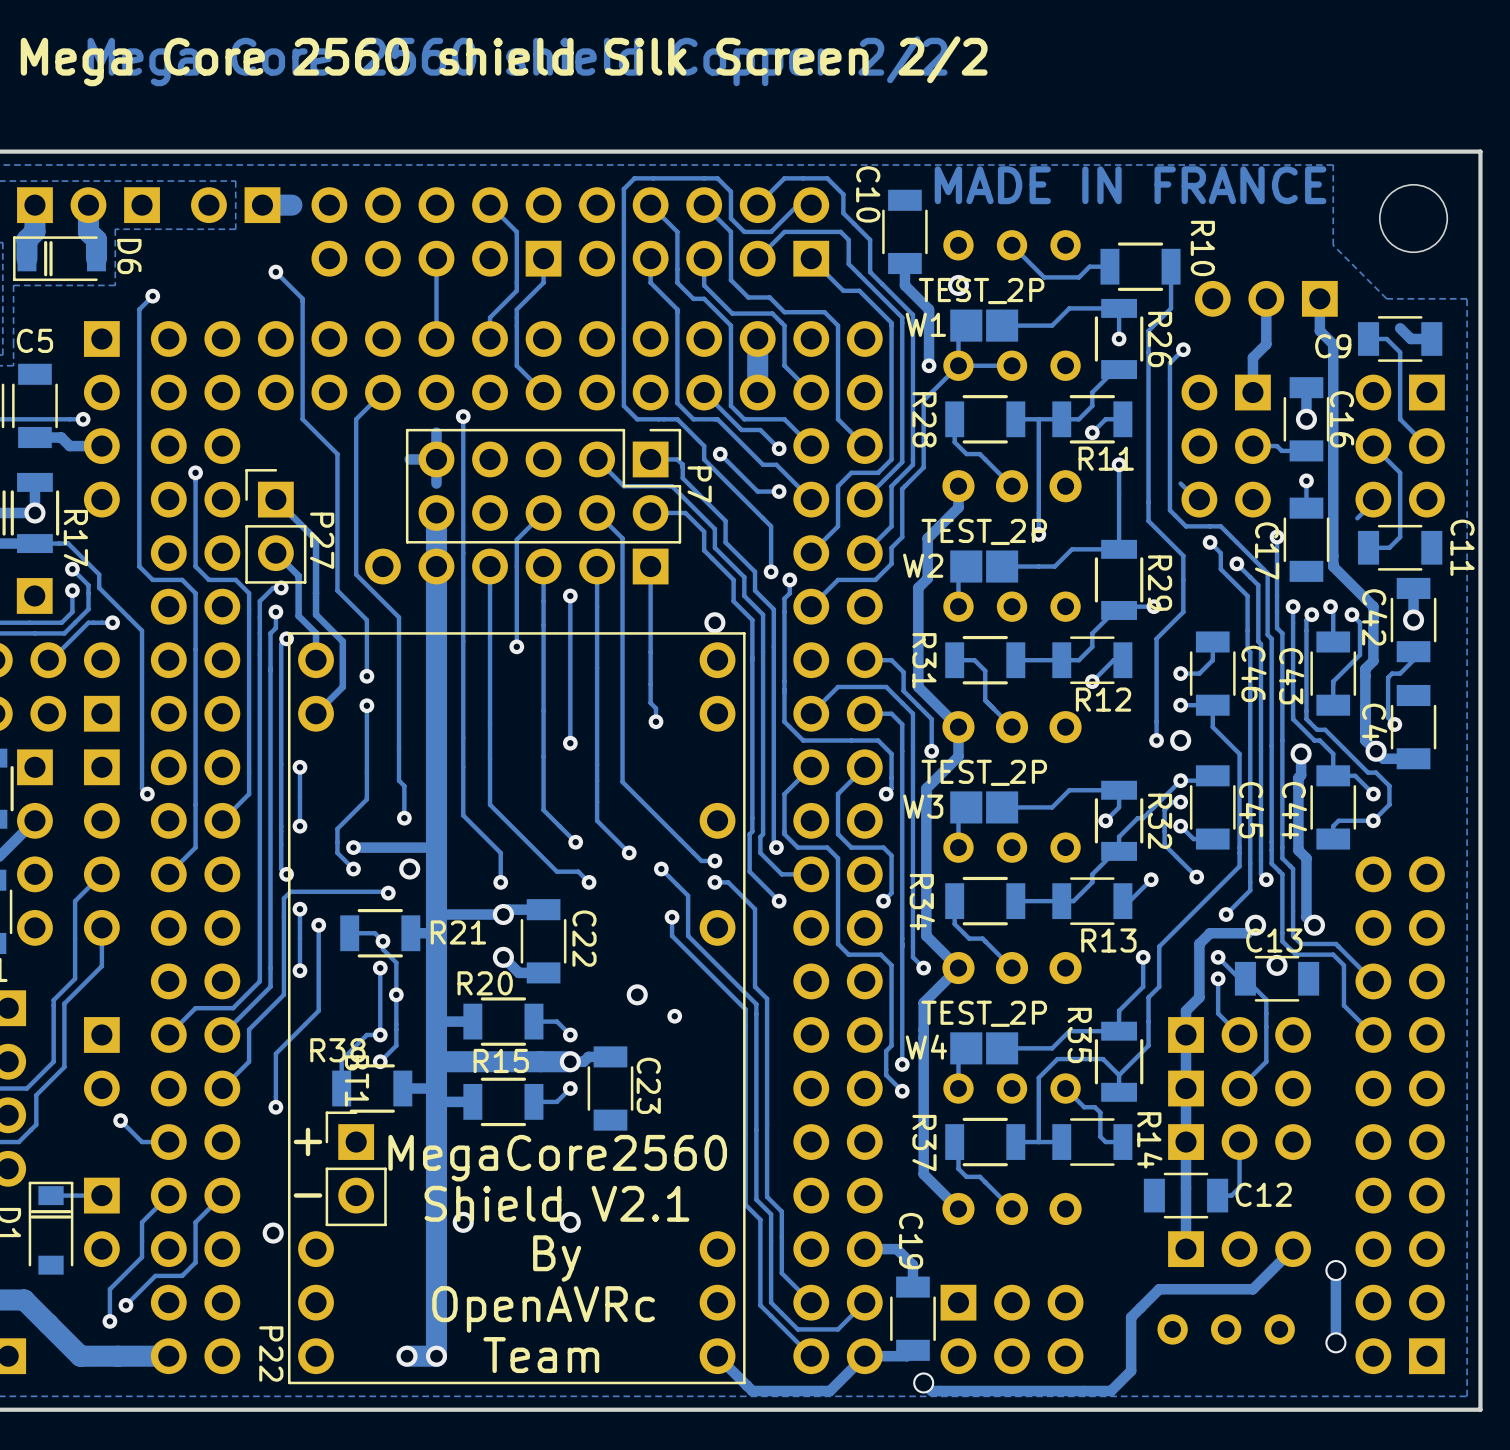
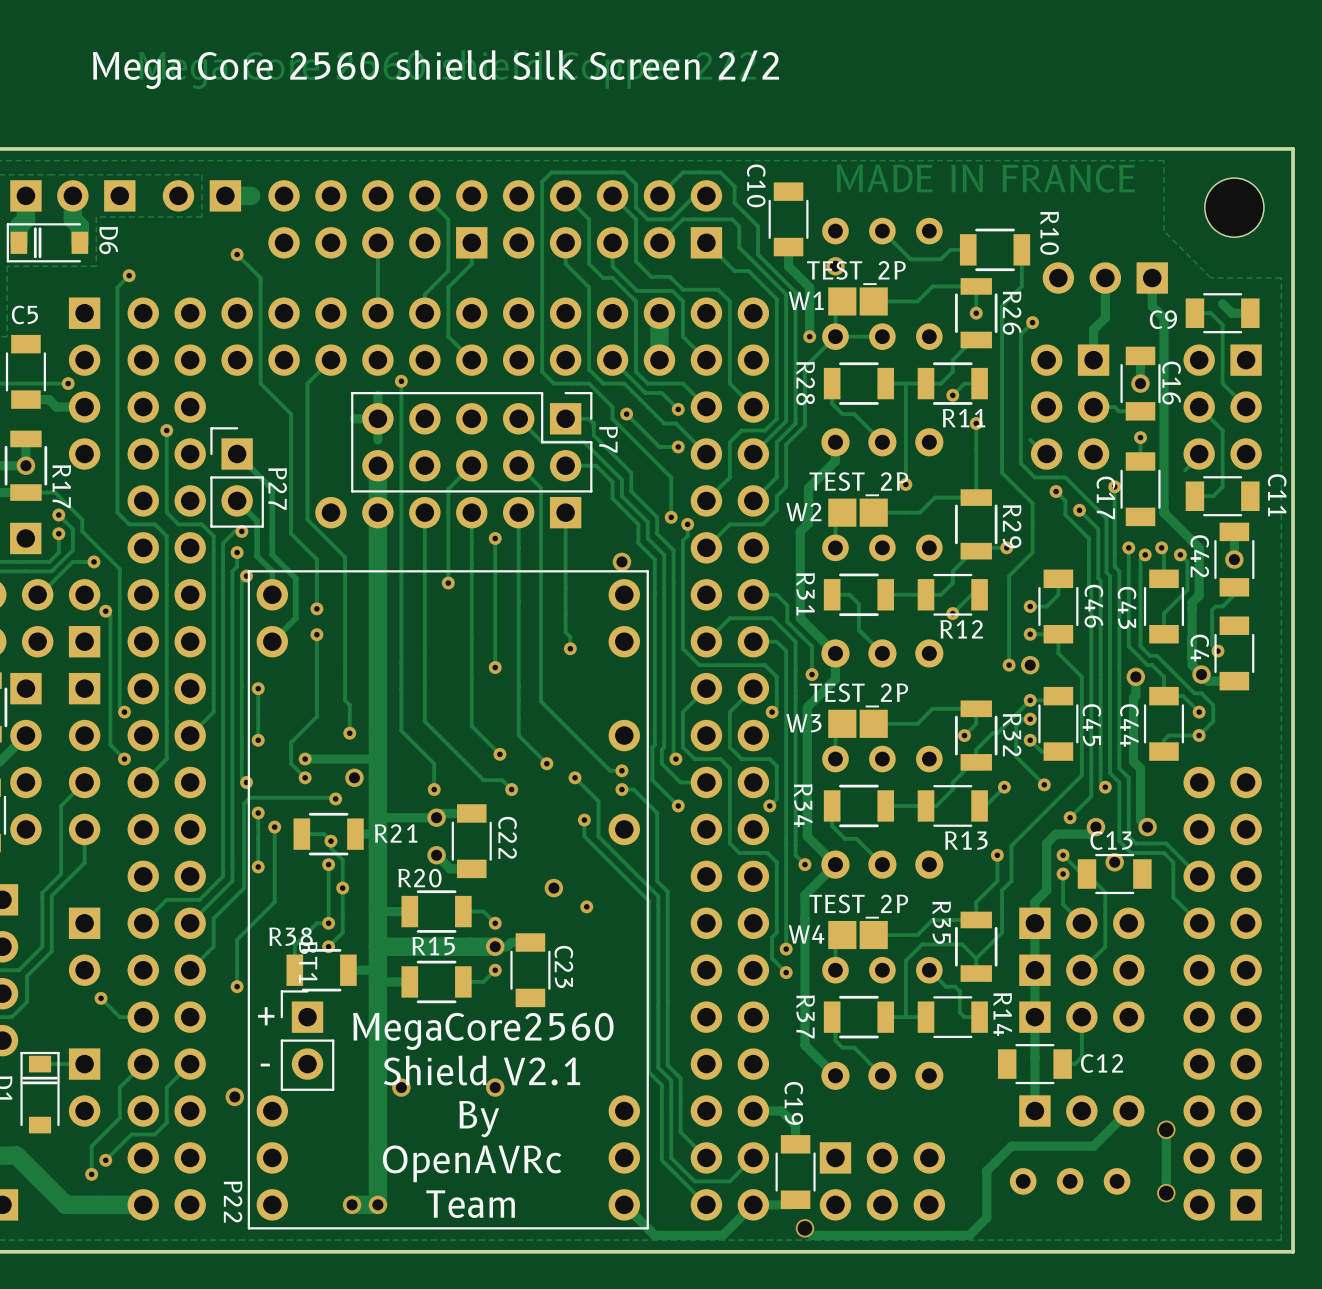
track: none -> (105, 611) (110, 615) (110, 744) (124, 759)
via: none -> (105, 611)
via: none -> (124, 759)

